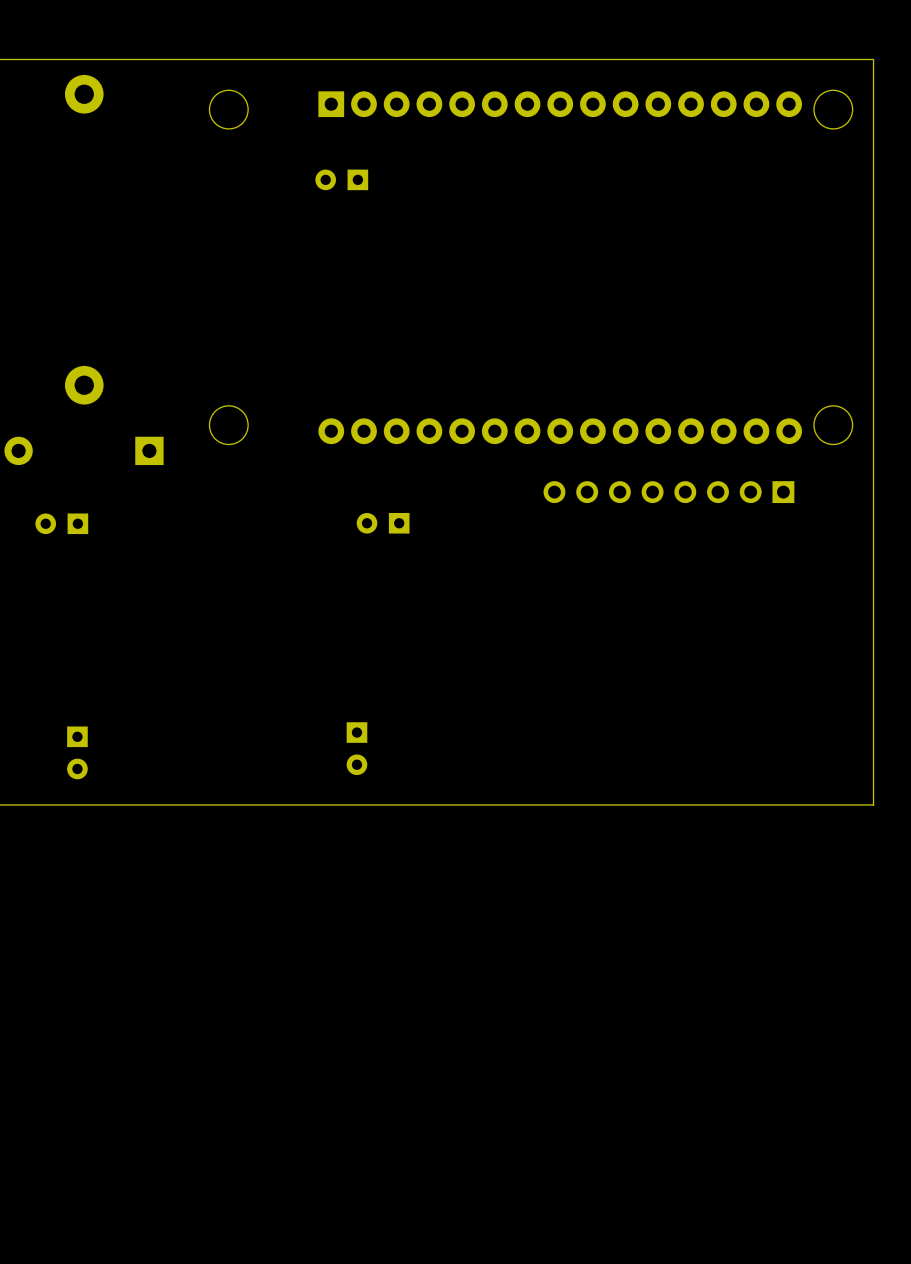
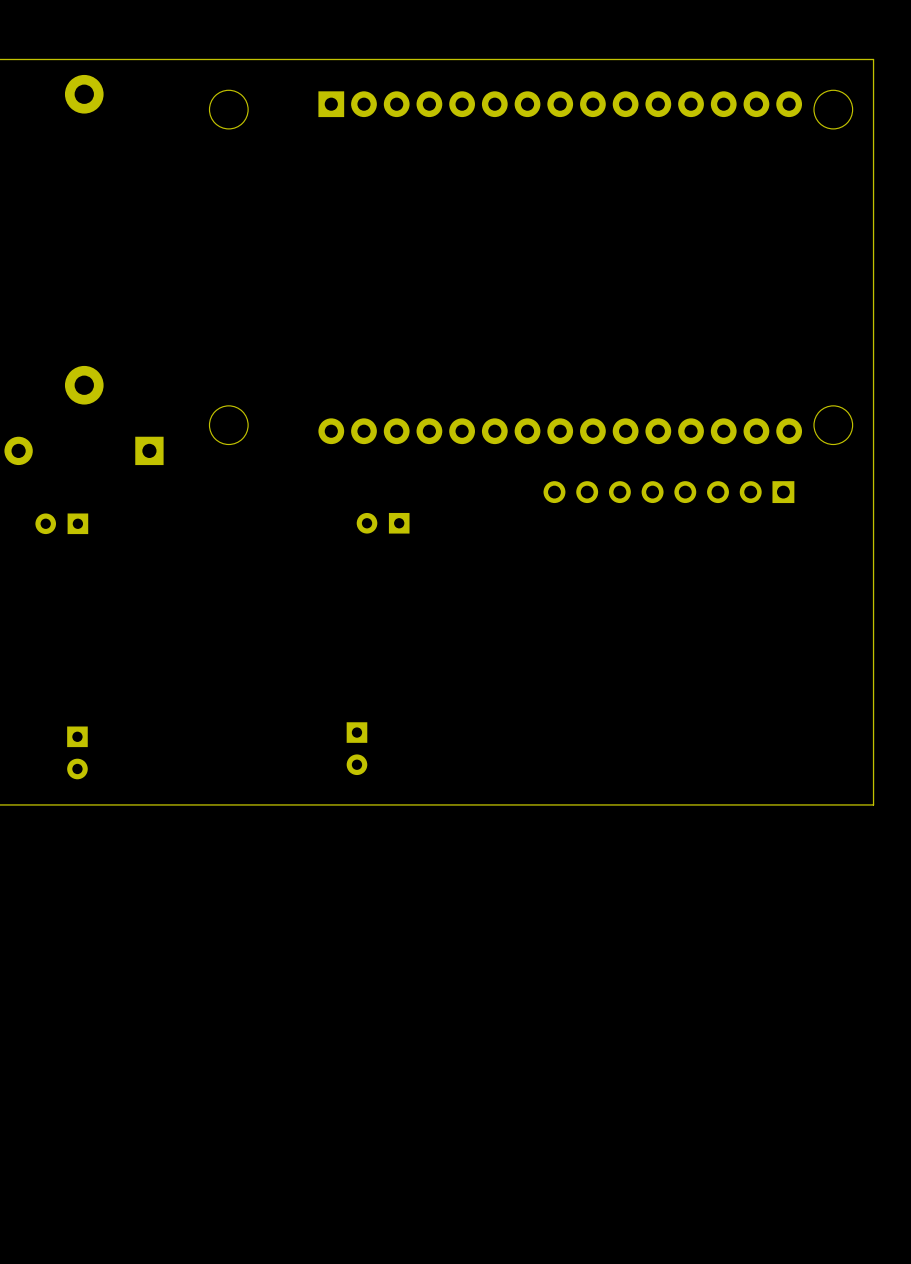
part: (341, 179) -> none

